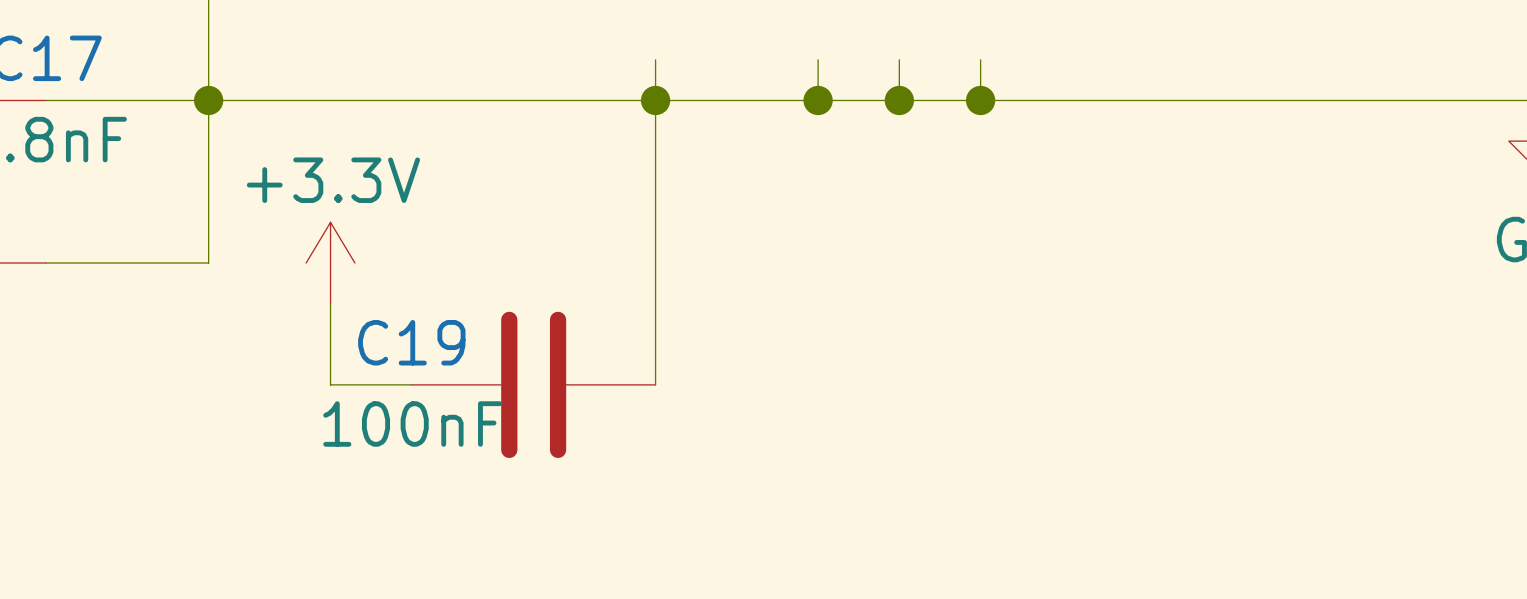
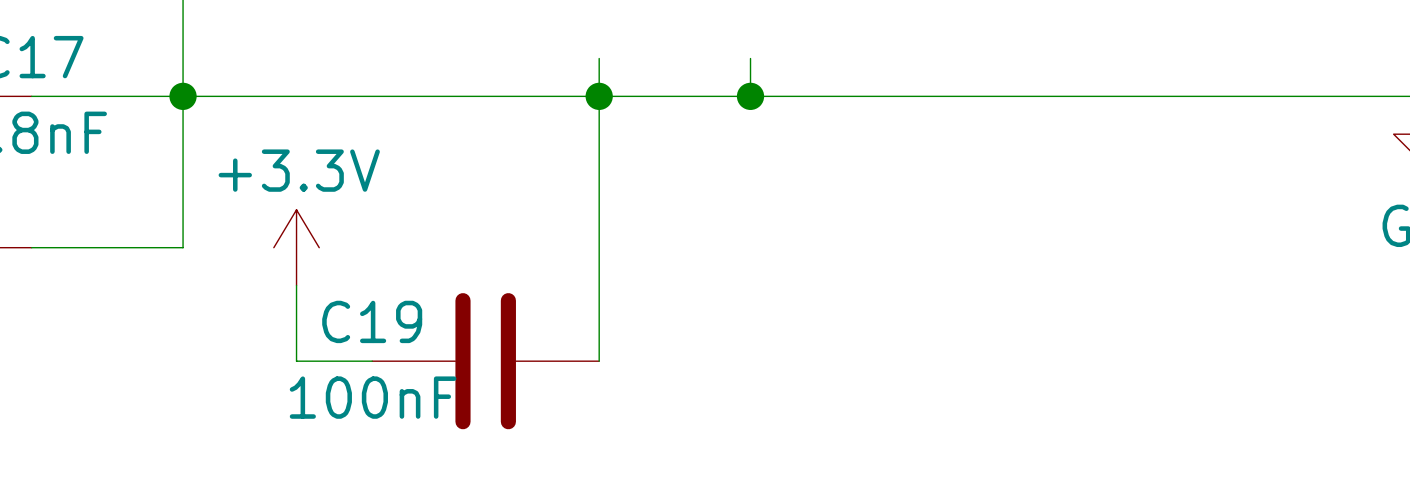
wire: (899, 59) (899, 100) -> none
wire: (980, 59) (980, 100) -> none
junction: (899, 100) -> none
junction: (980, 100) -> none

